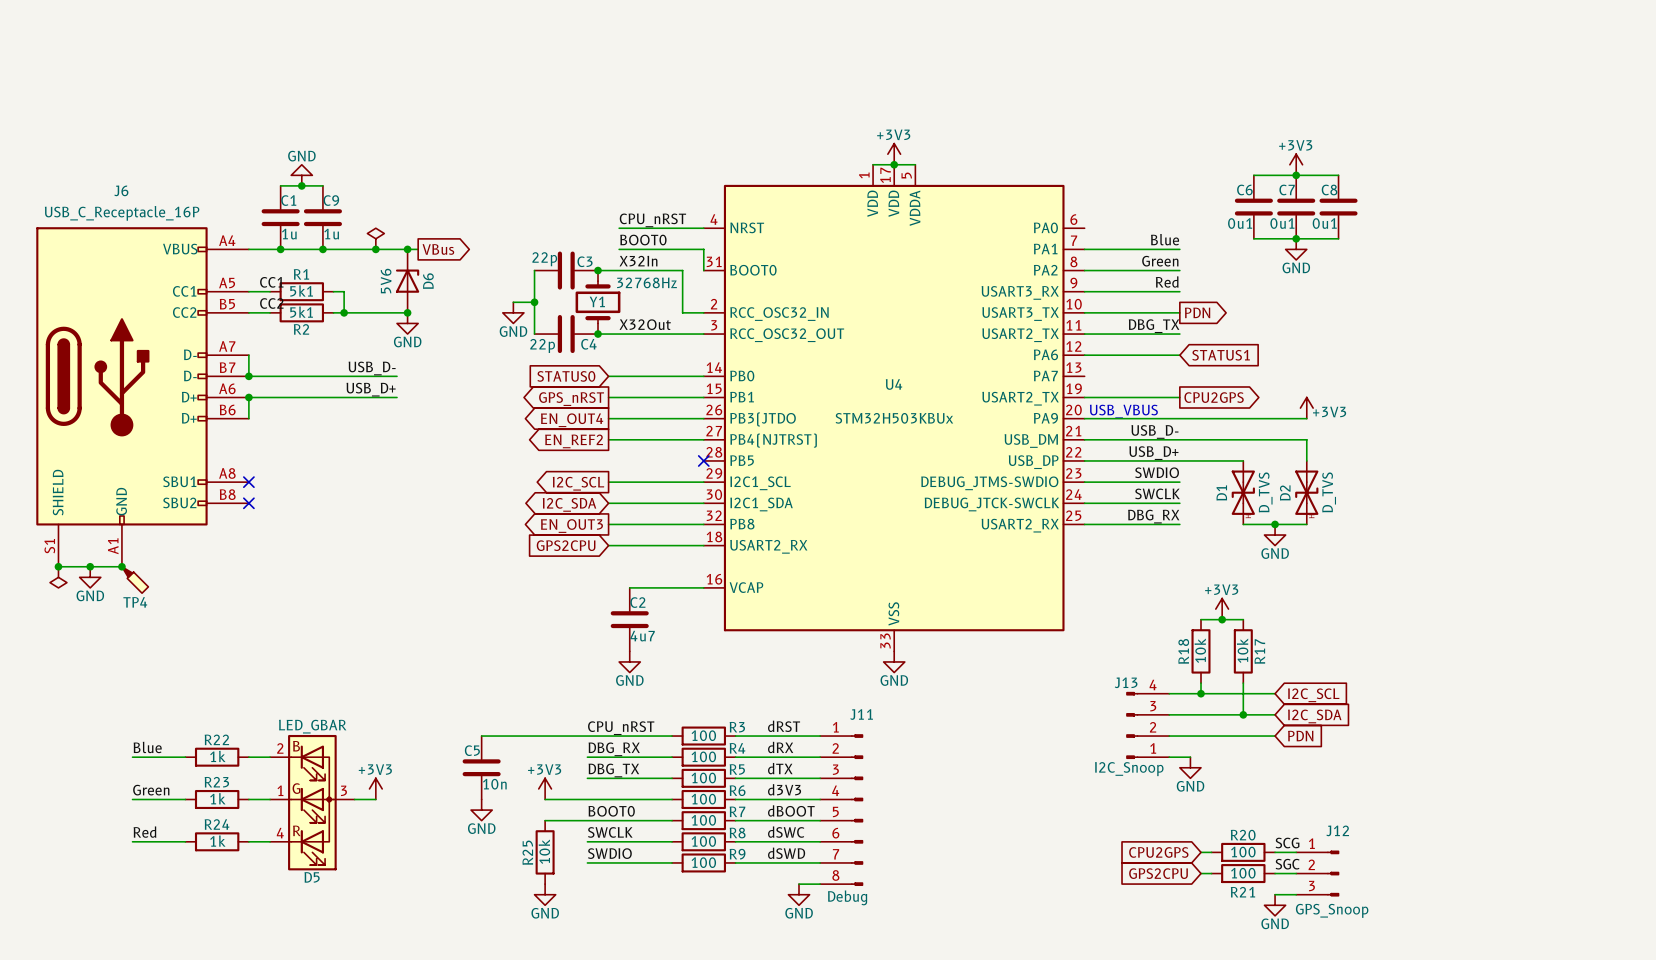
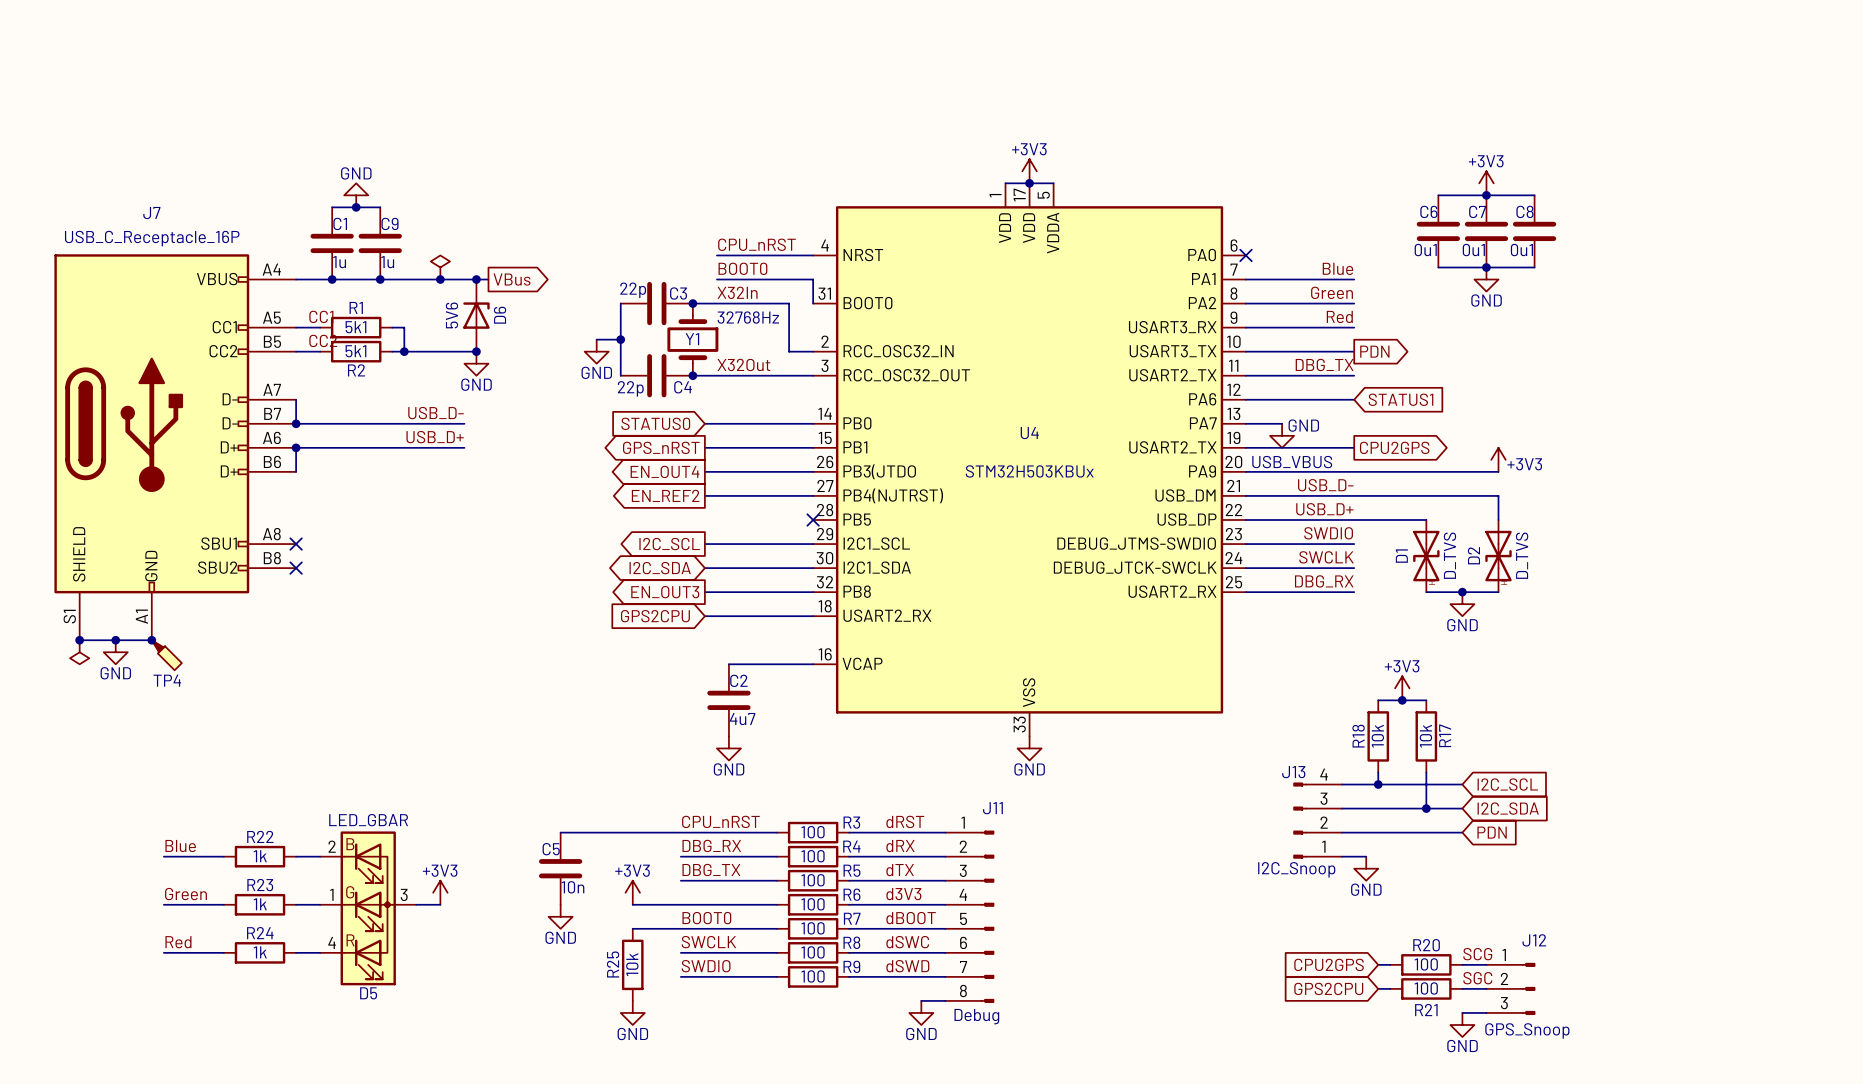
J6 name: J6 (121, 190) -> J7 (151, 213)
no-connect mark: none -> (1245, 255)
wire: none -> (1245, 423) (1282, 423)
power symbol: none -> GND (1282, 435)

